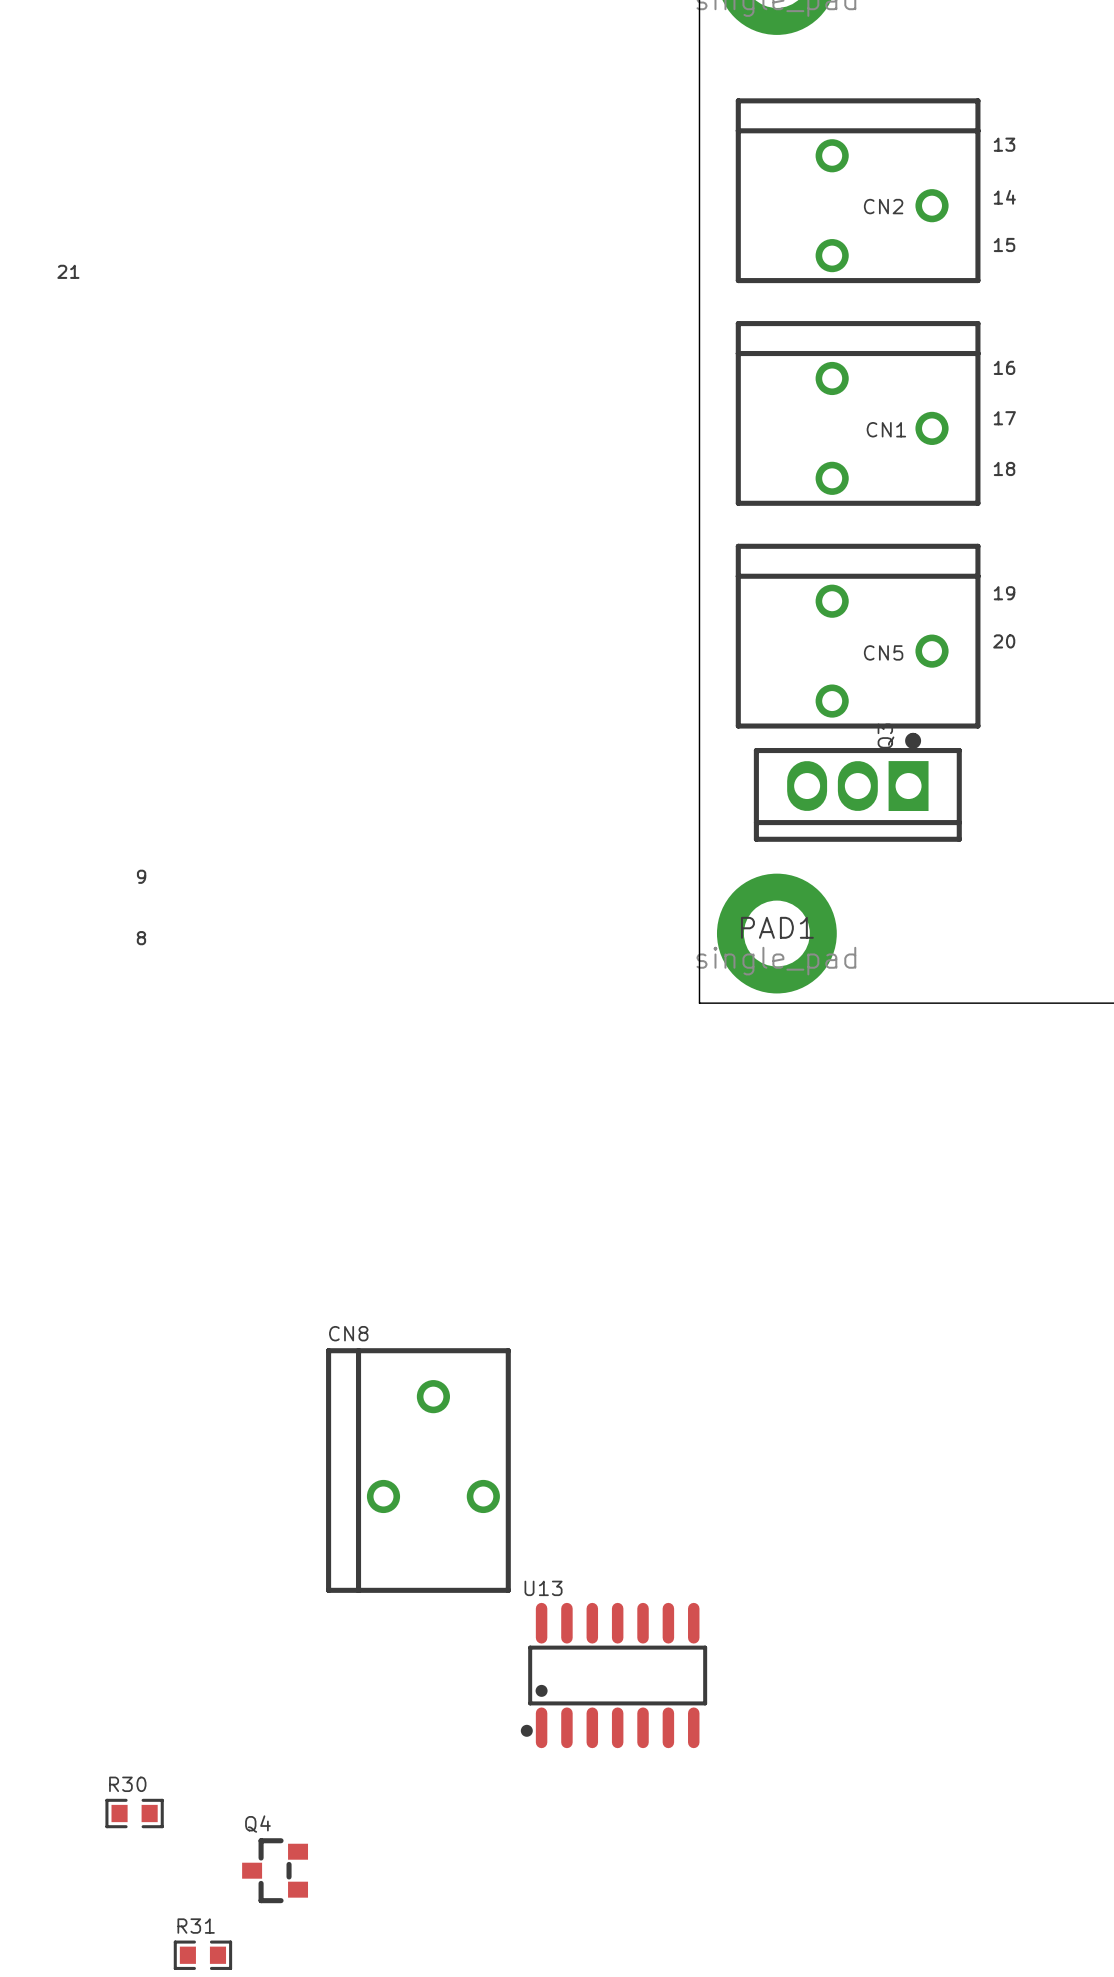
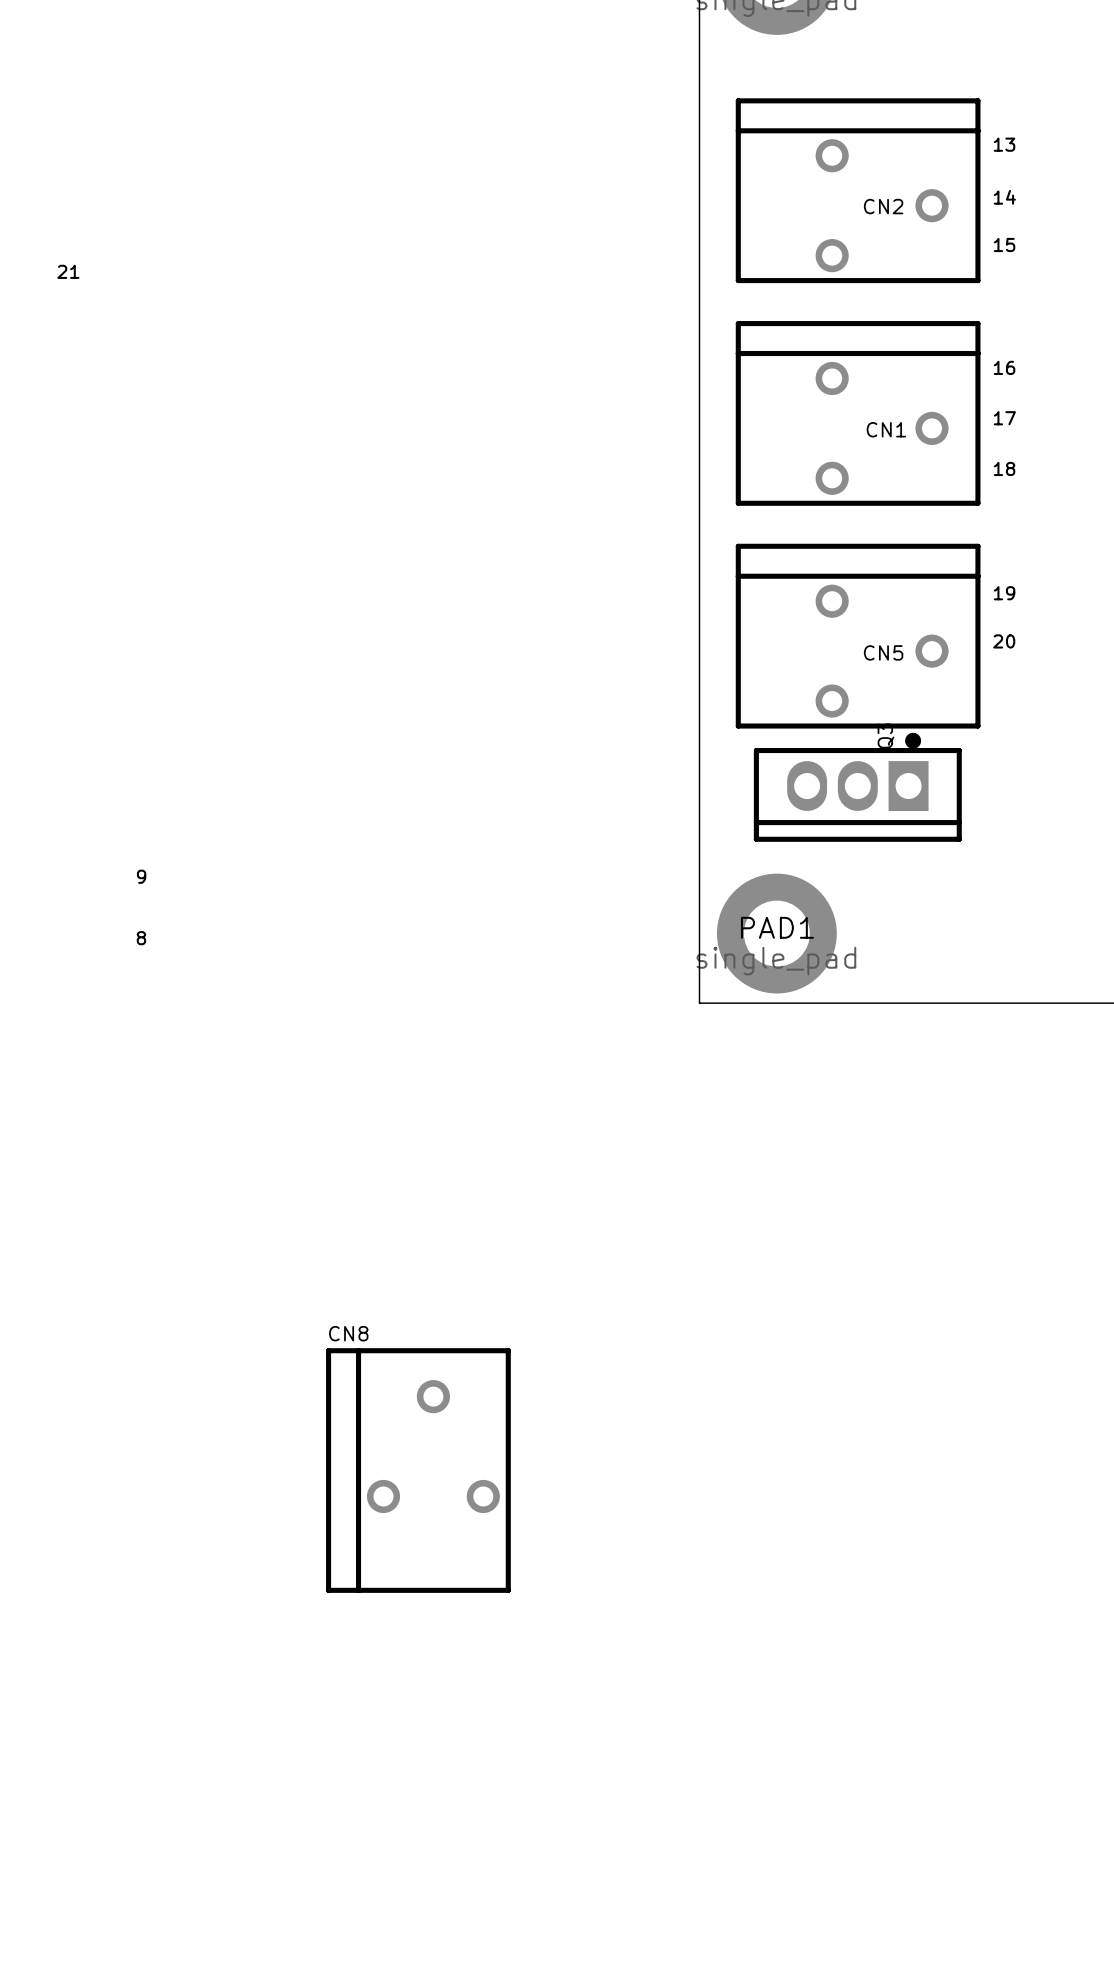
U13: (613, 1675) -> none
R30: (134, 1813) -> none
Q4: (275, 1870) -> none
R31: (202, 1955) -> none

